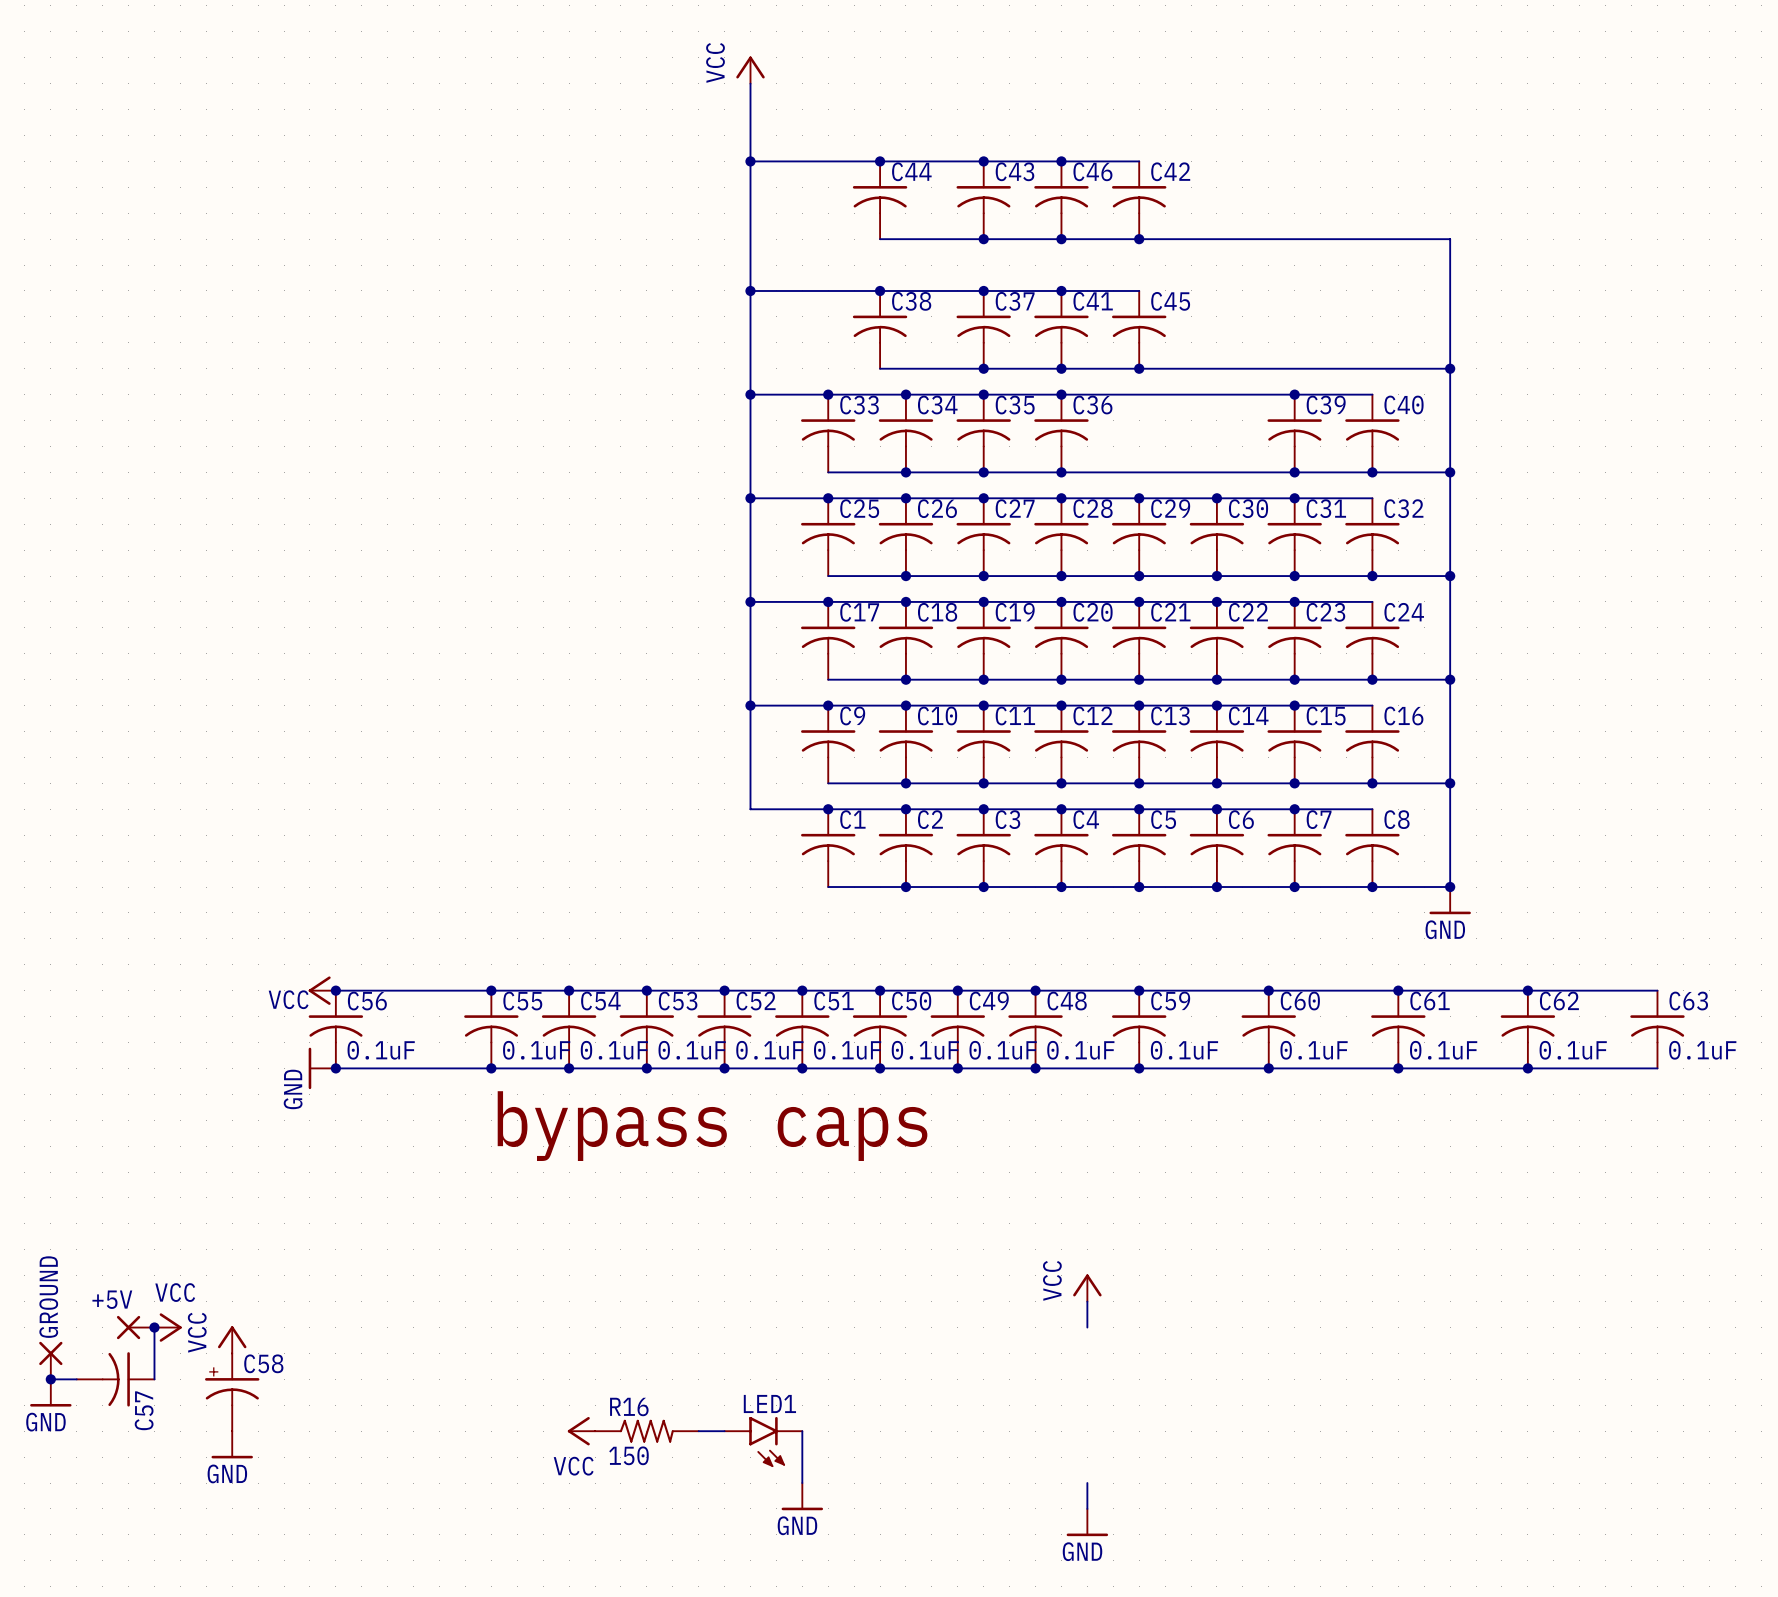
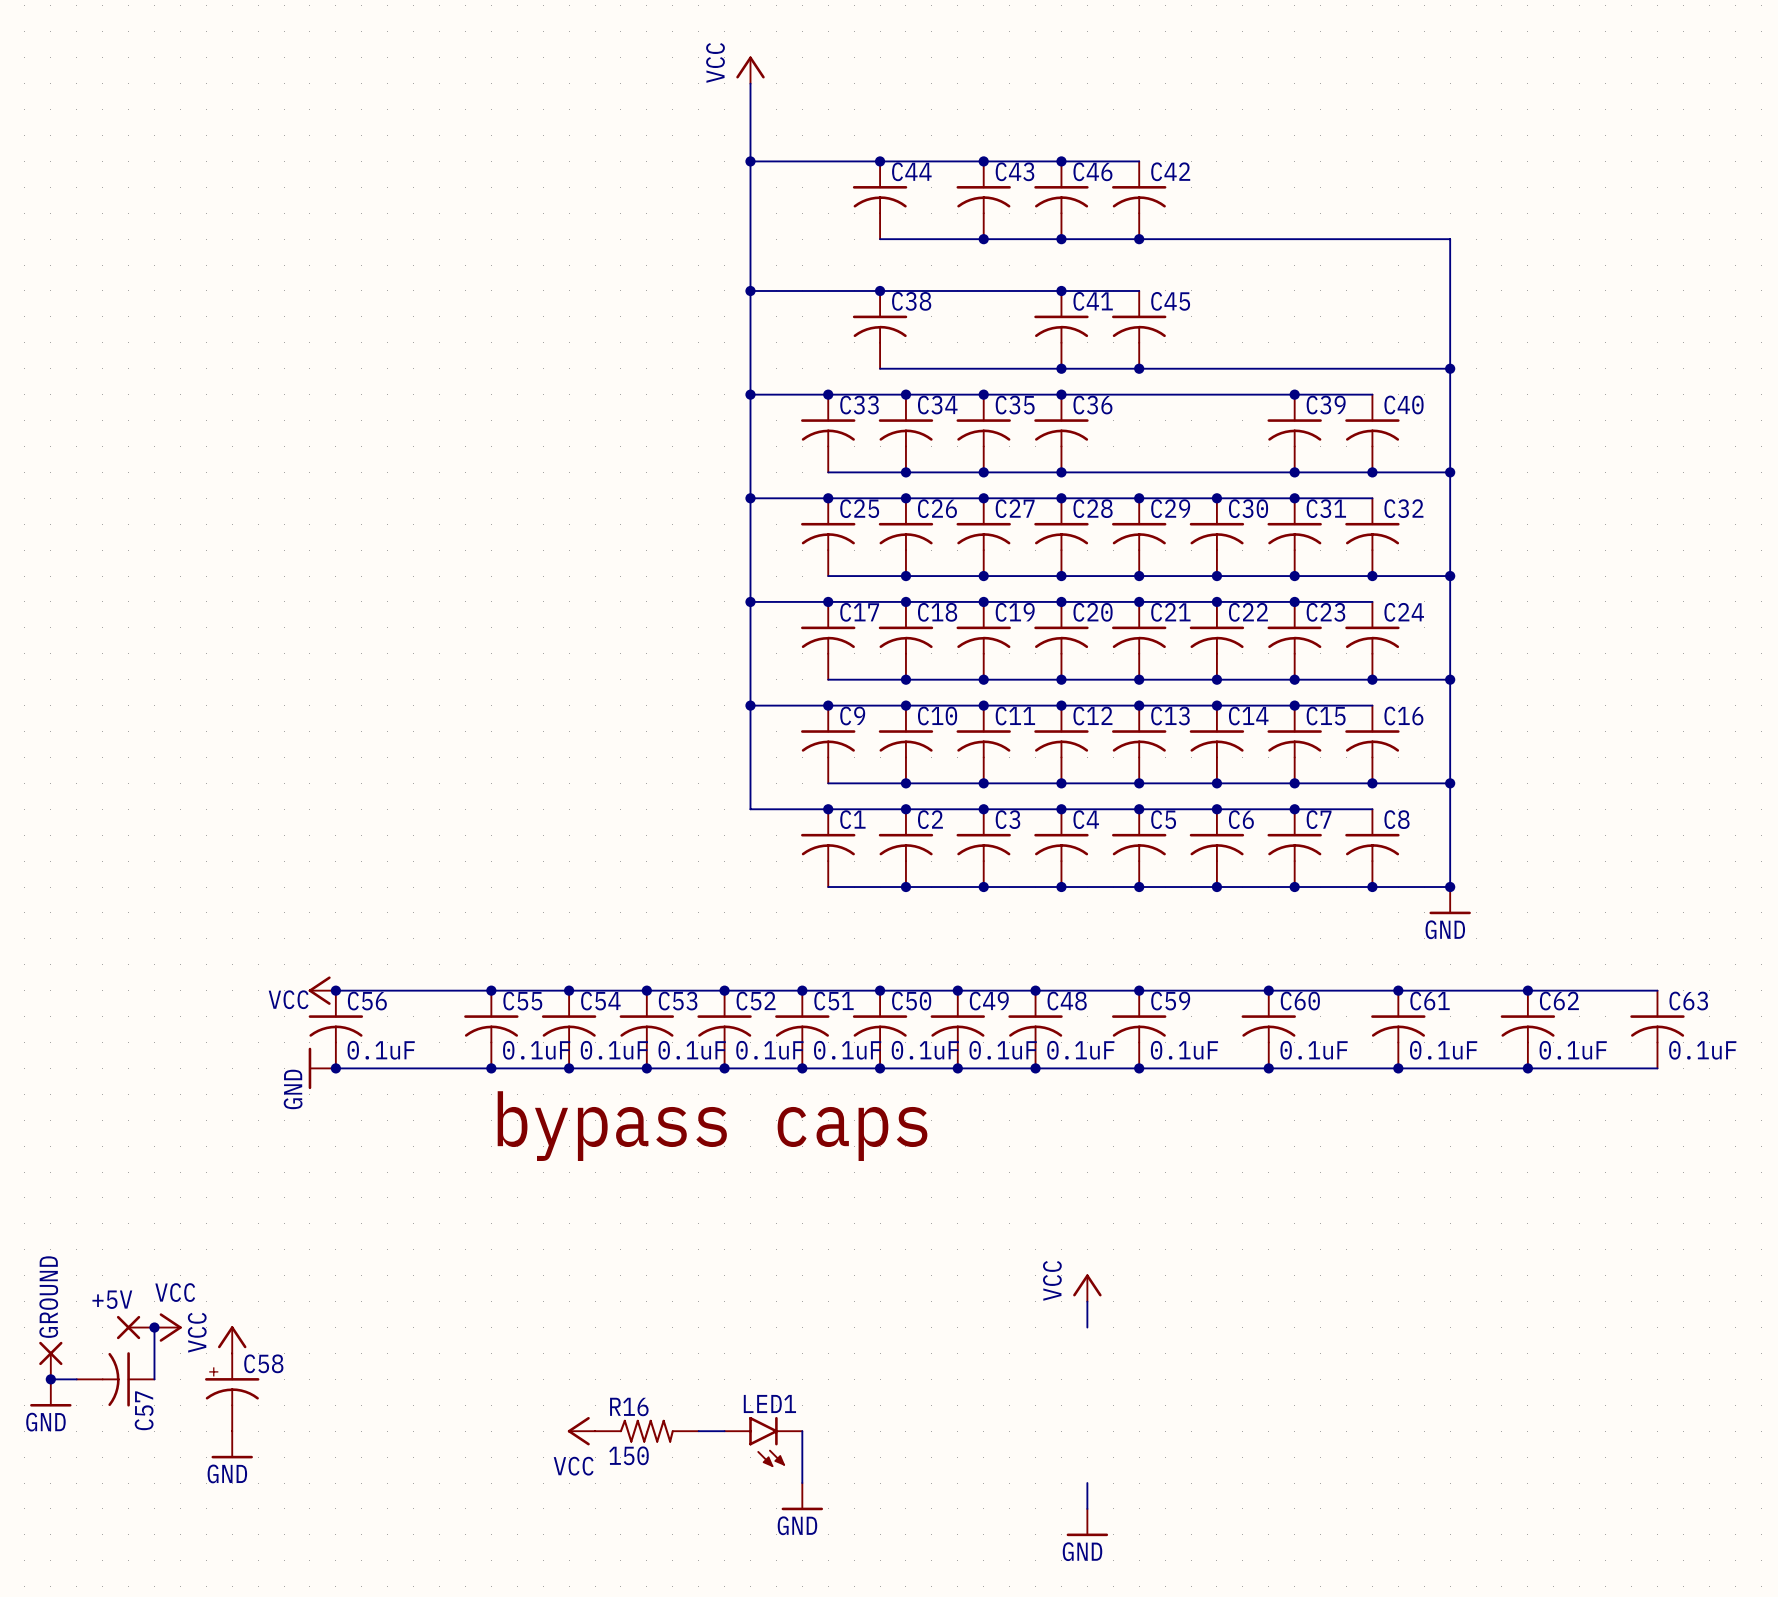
junction: (983, 290) -> none
C37: (983, 329) -> none
junction: (983, 368) -> none

